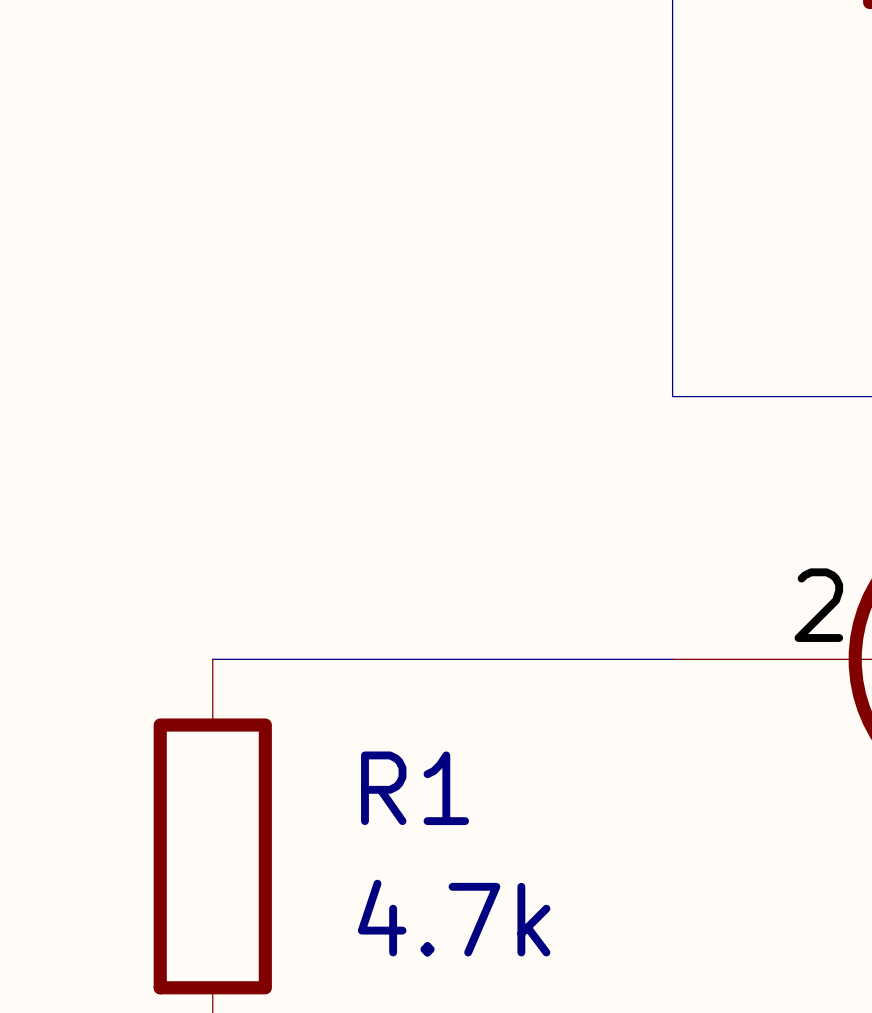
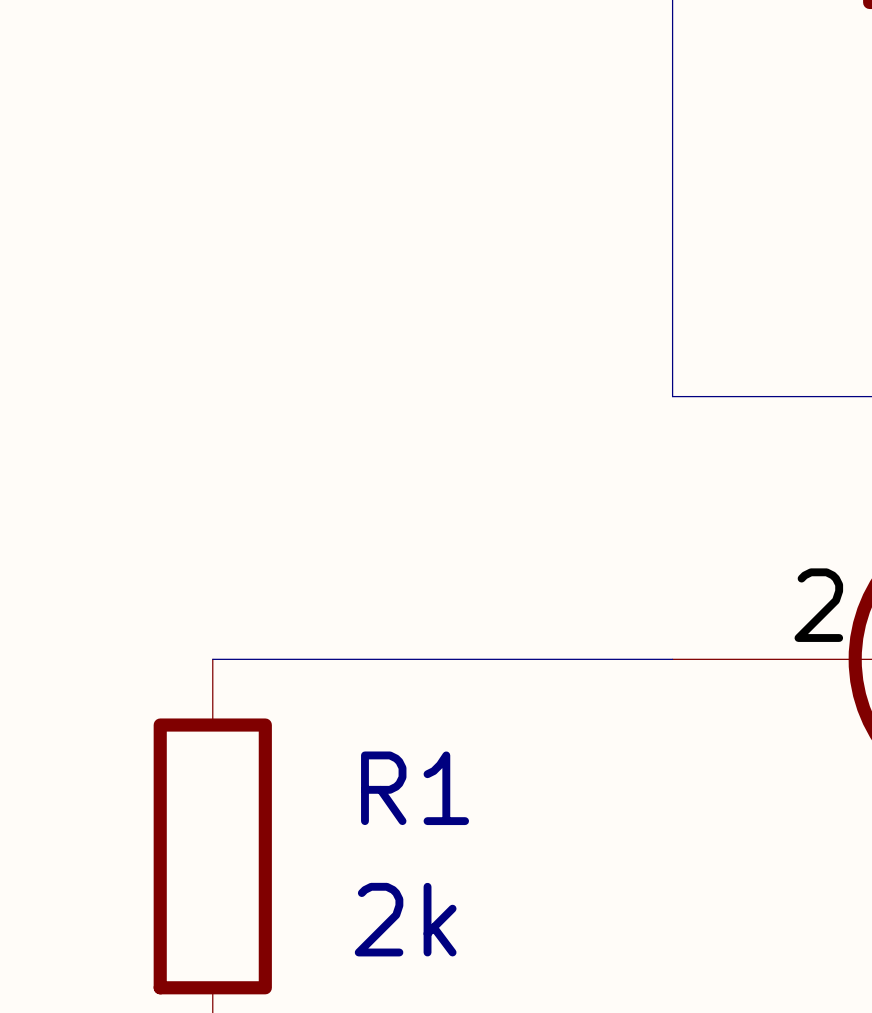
R1 value: 4.7k (454, 918) -> 2k (405, 919)

